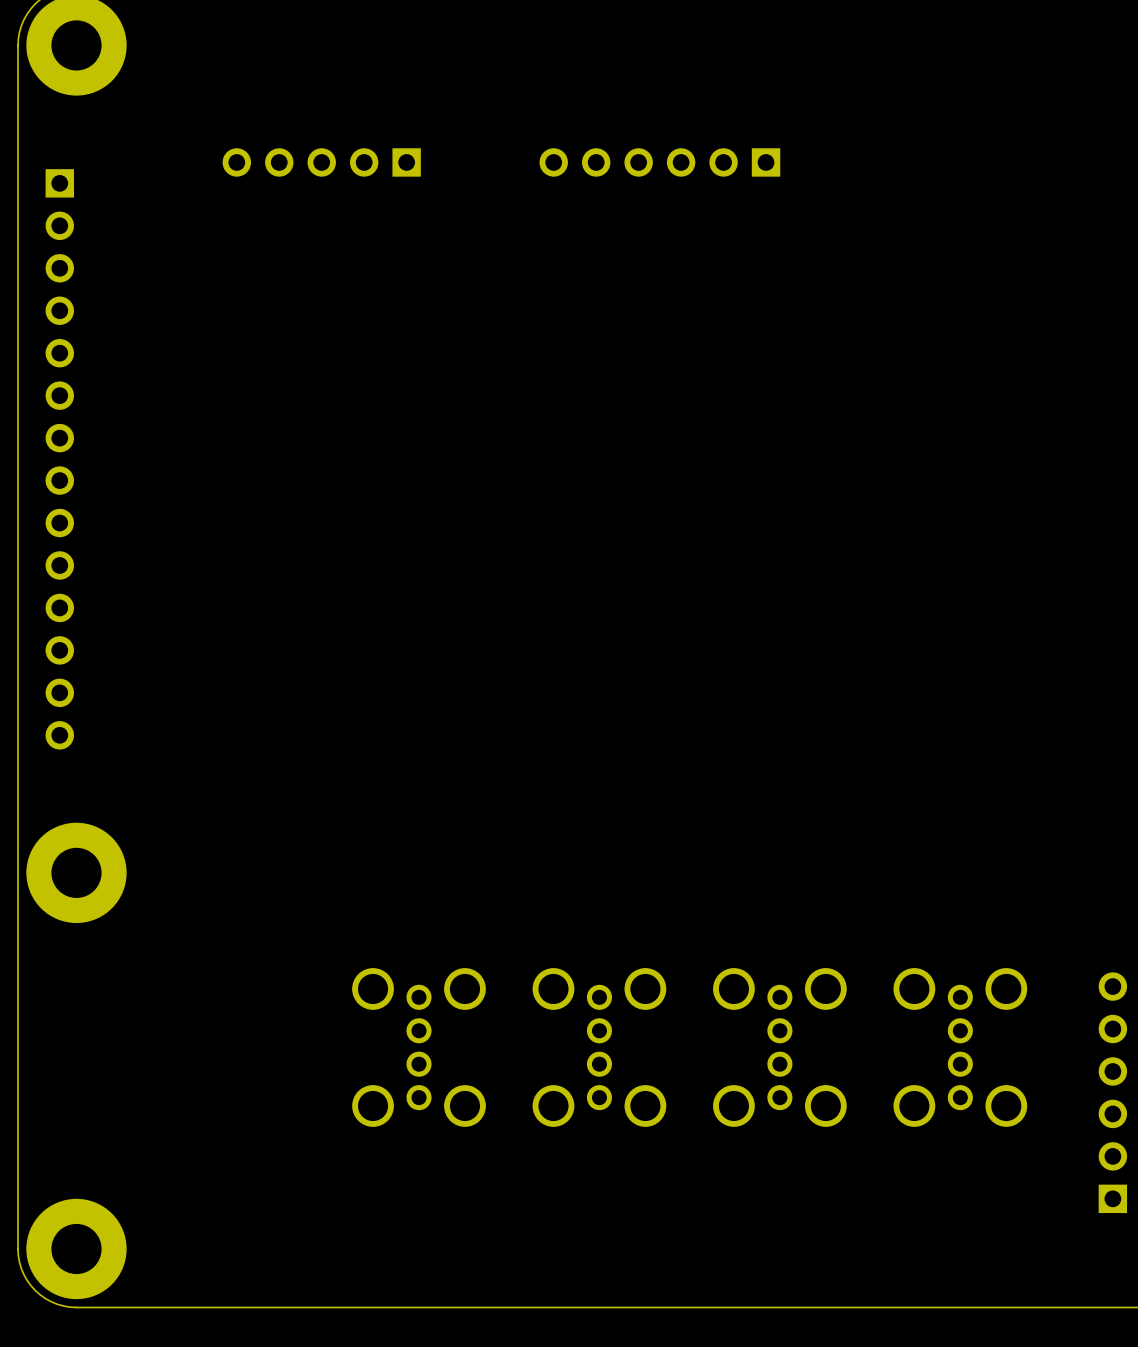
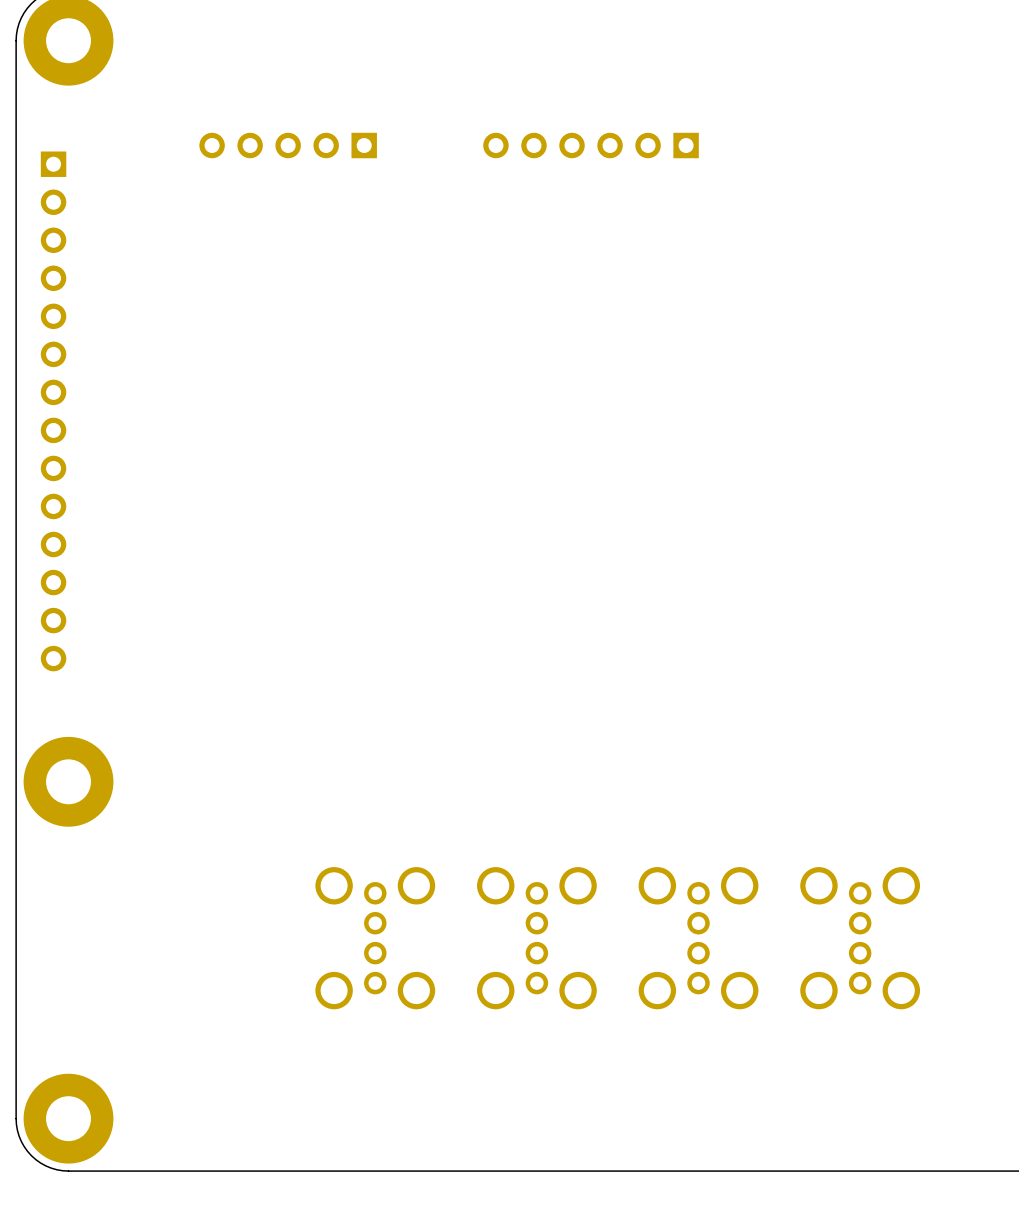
part: (1112, 1092) -> none

